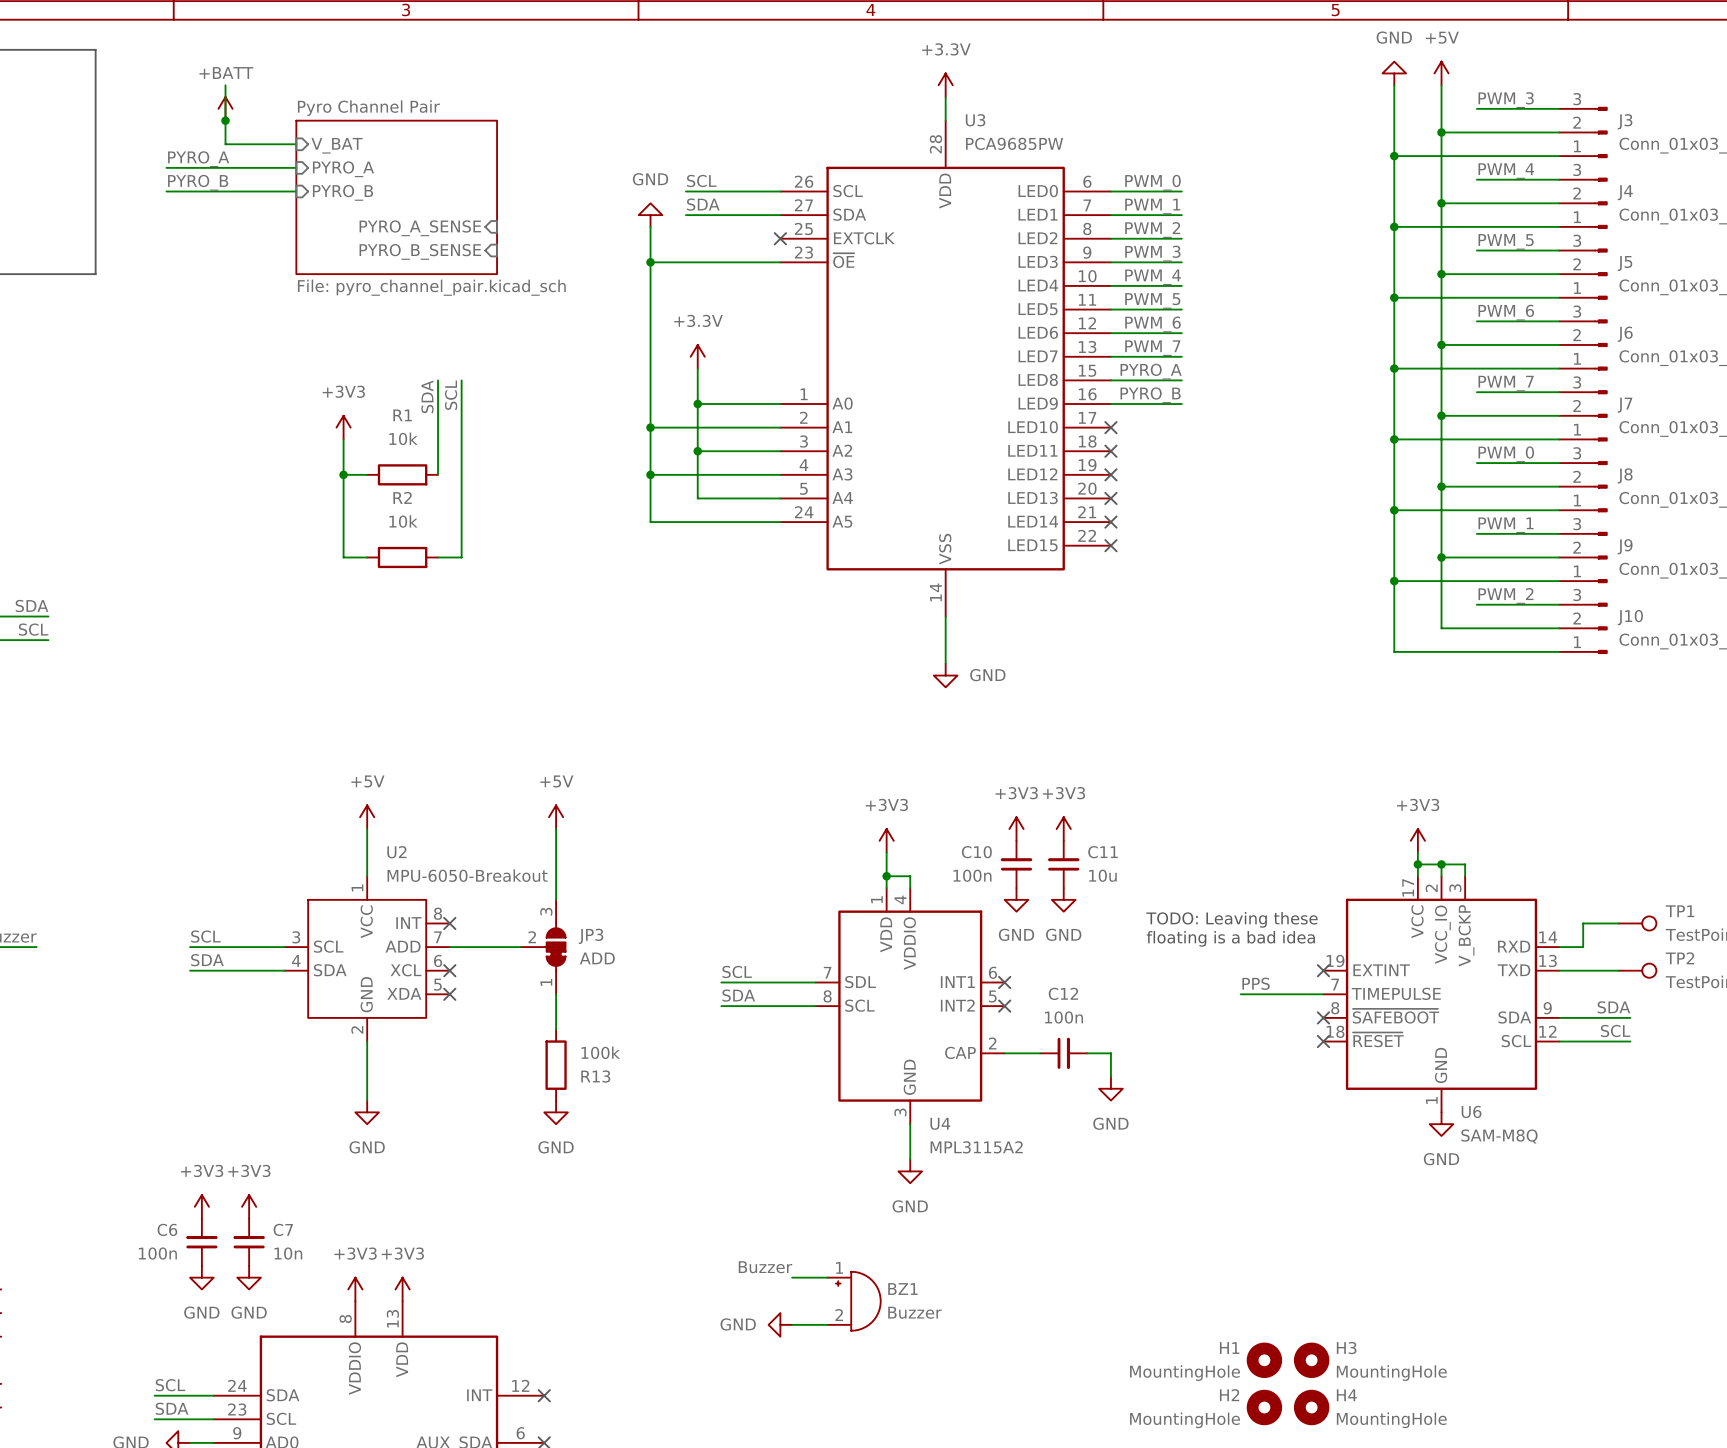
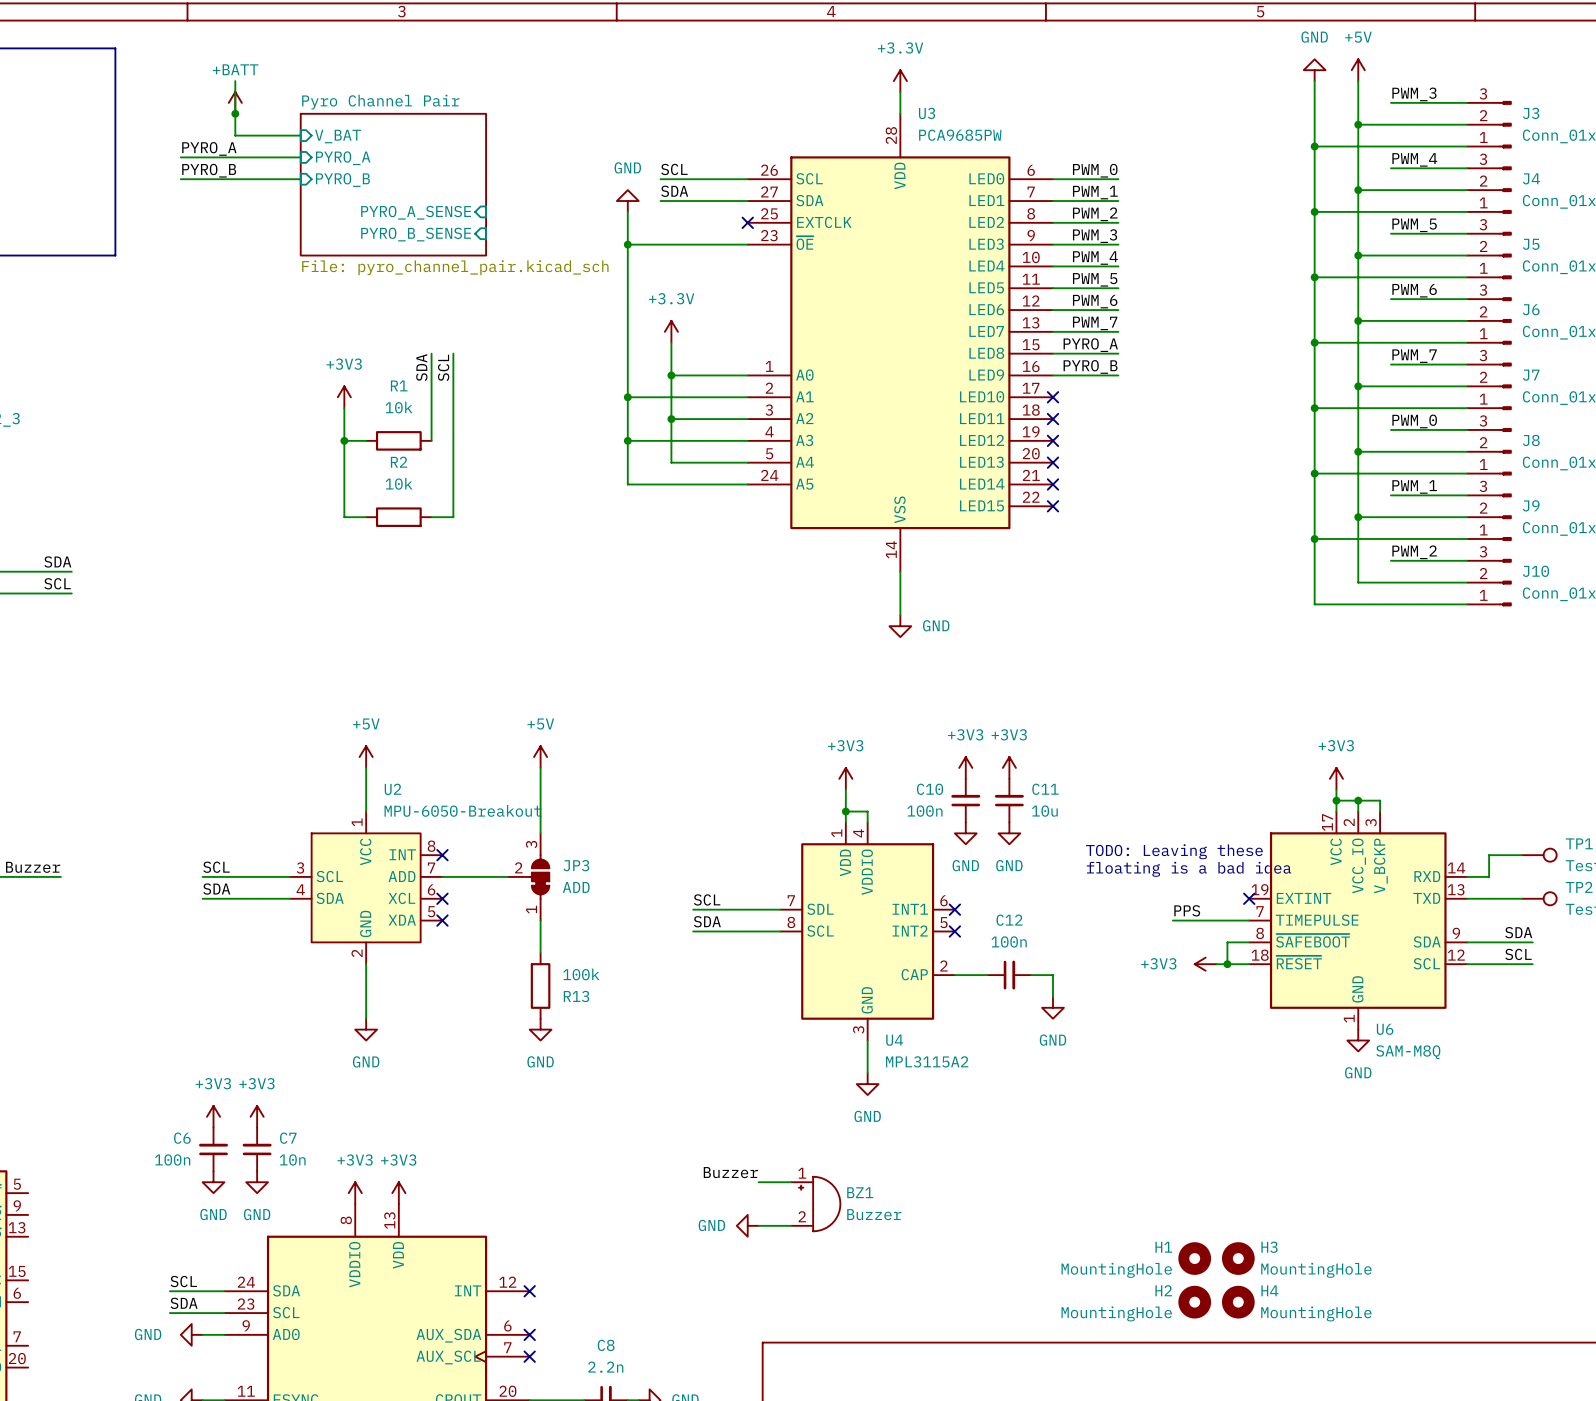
wire: none -> (1249, 942) (1227, 942) (1227, 964)
no-connect mark: (1323, 1017) -> none
power symbol: none -> +3V3 (1205, 964)
wire: none -> (1216, 964) (1249, 964)
junction: none -> (1227, 964)
no-connect mark: (1323, 1041) -> none

